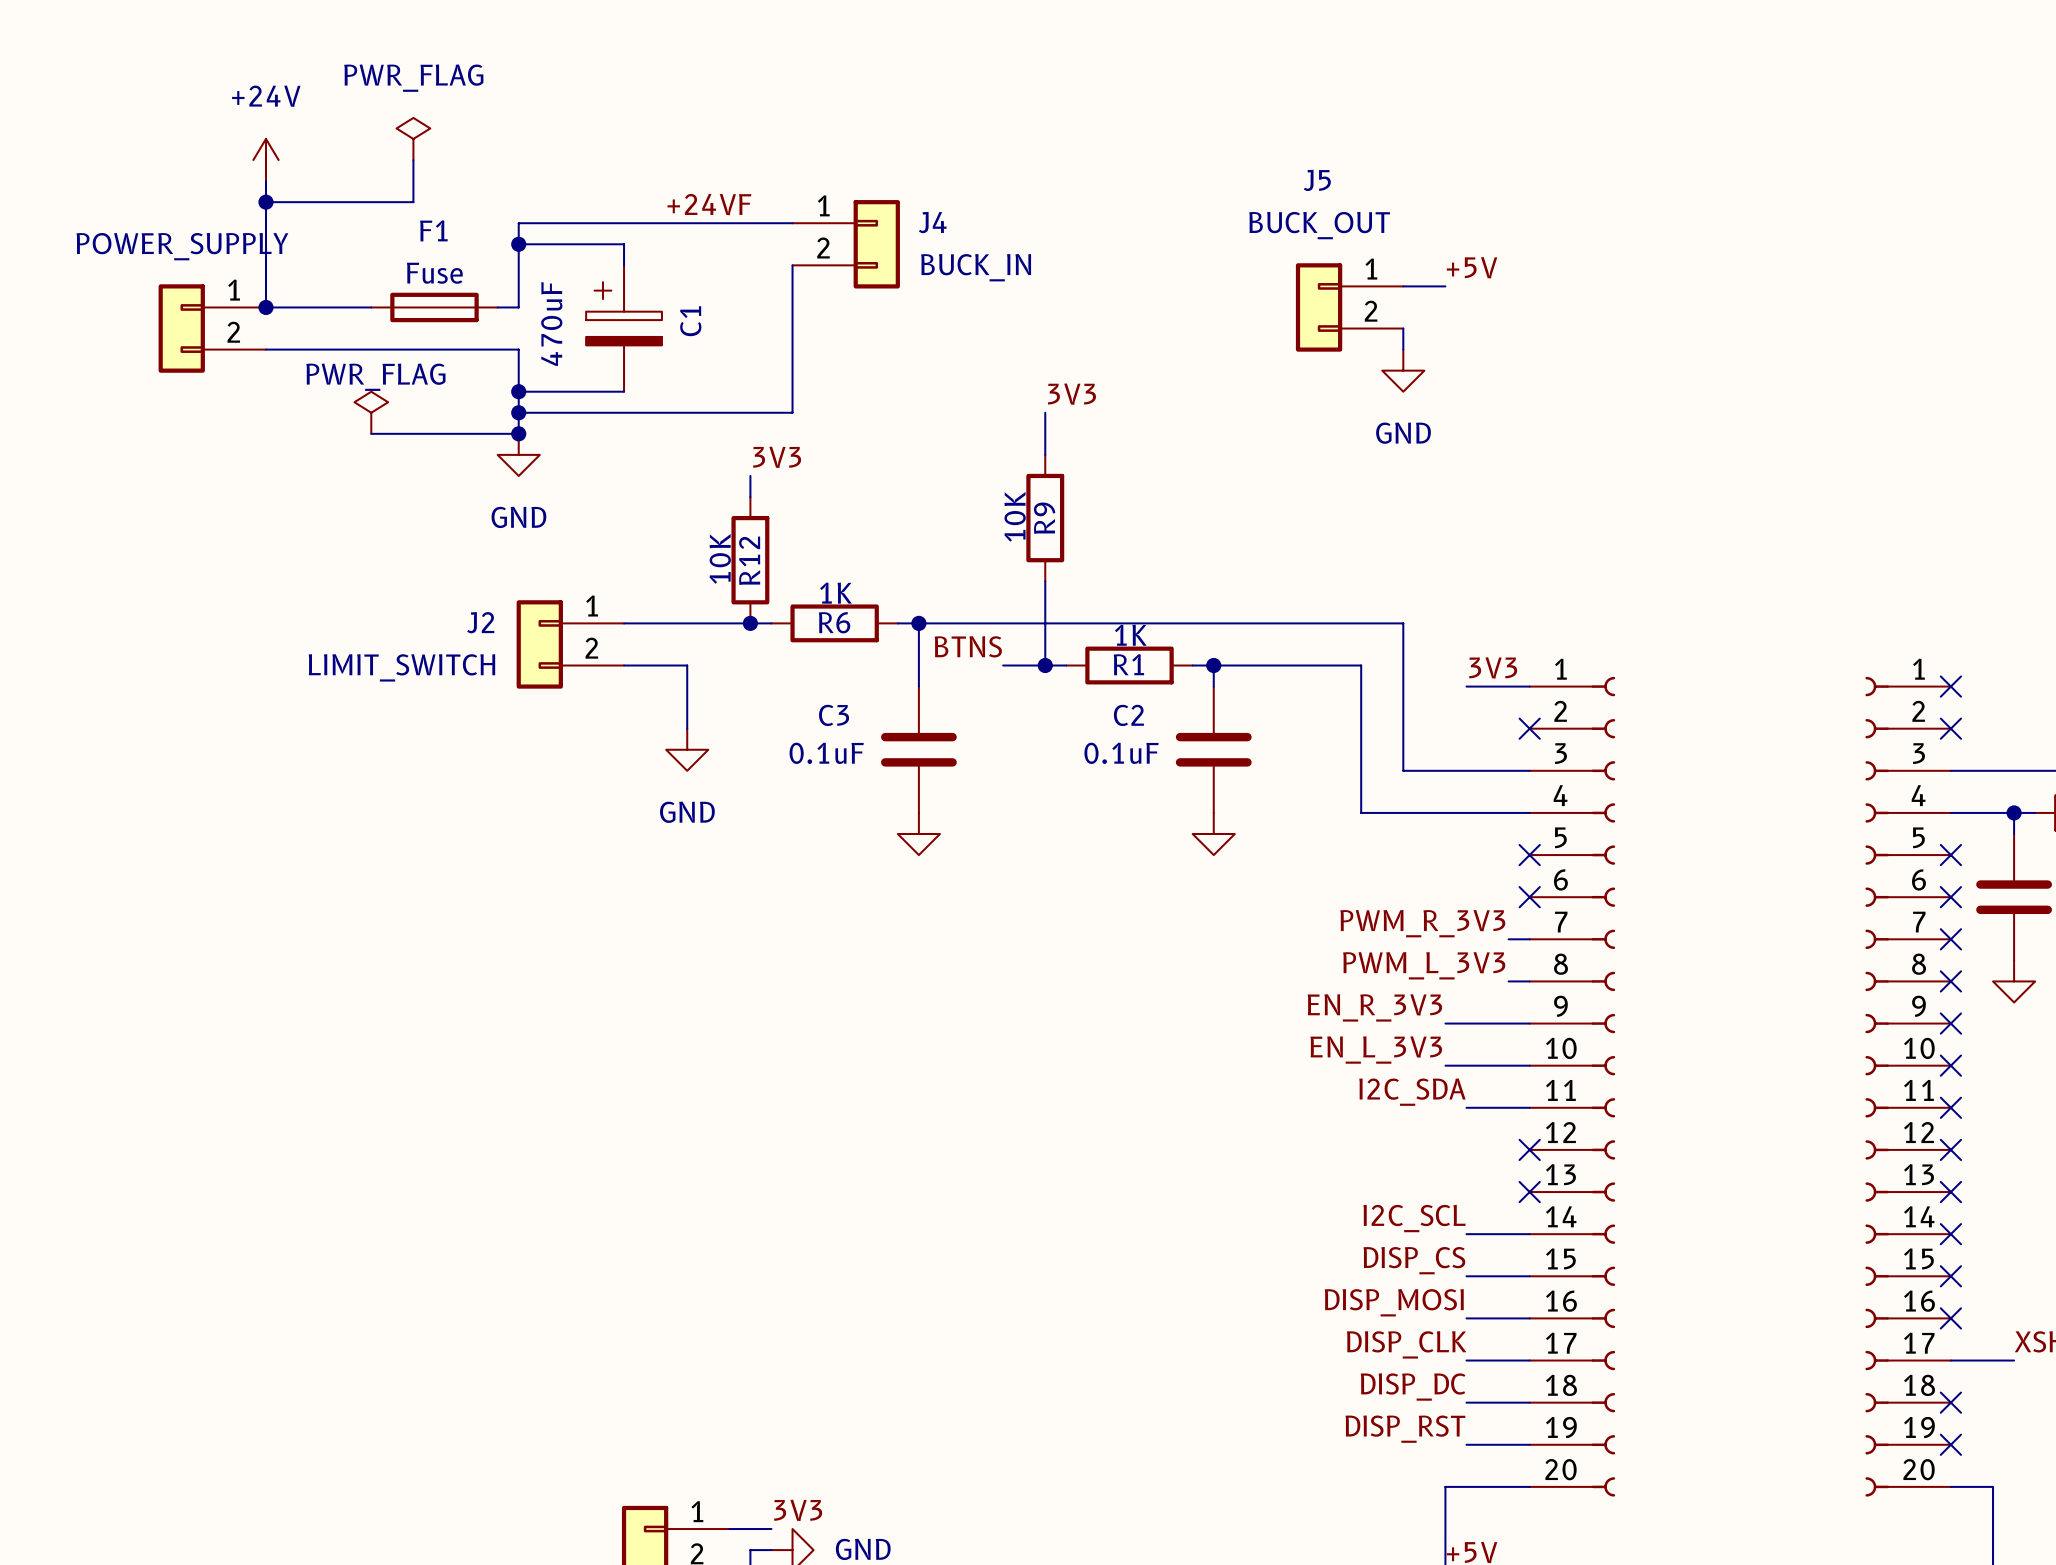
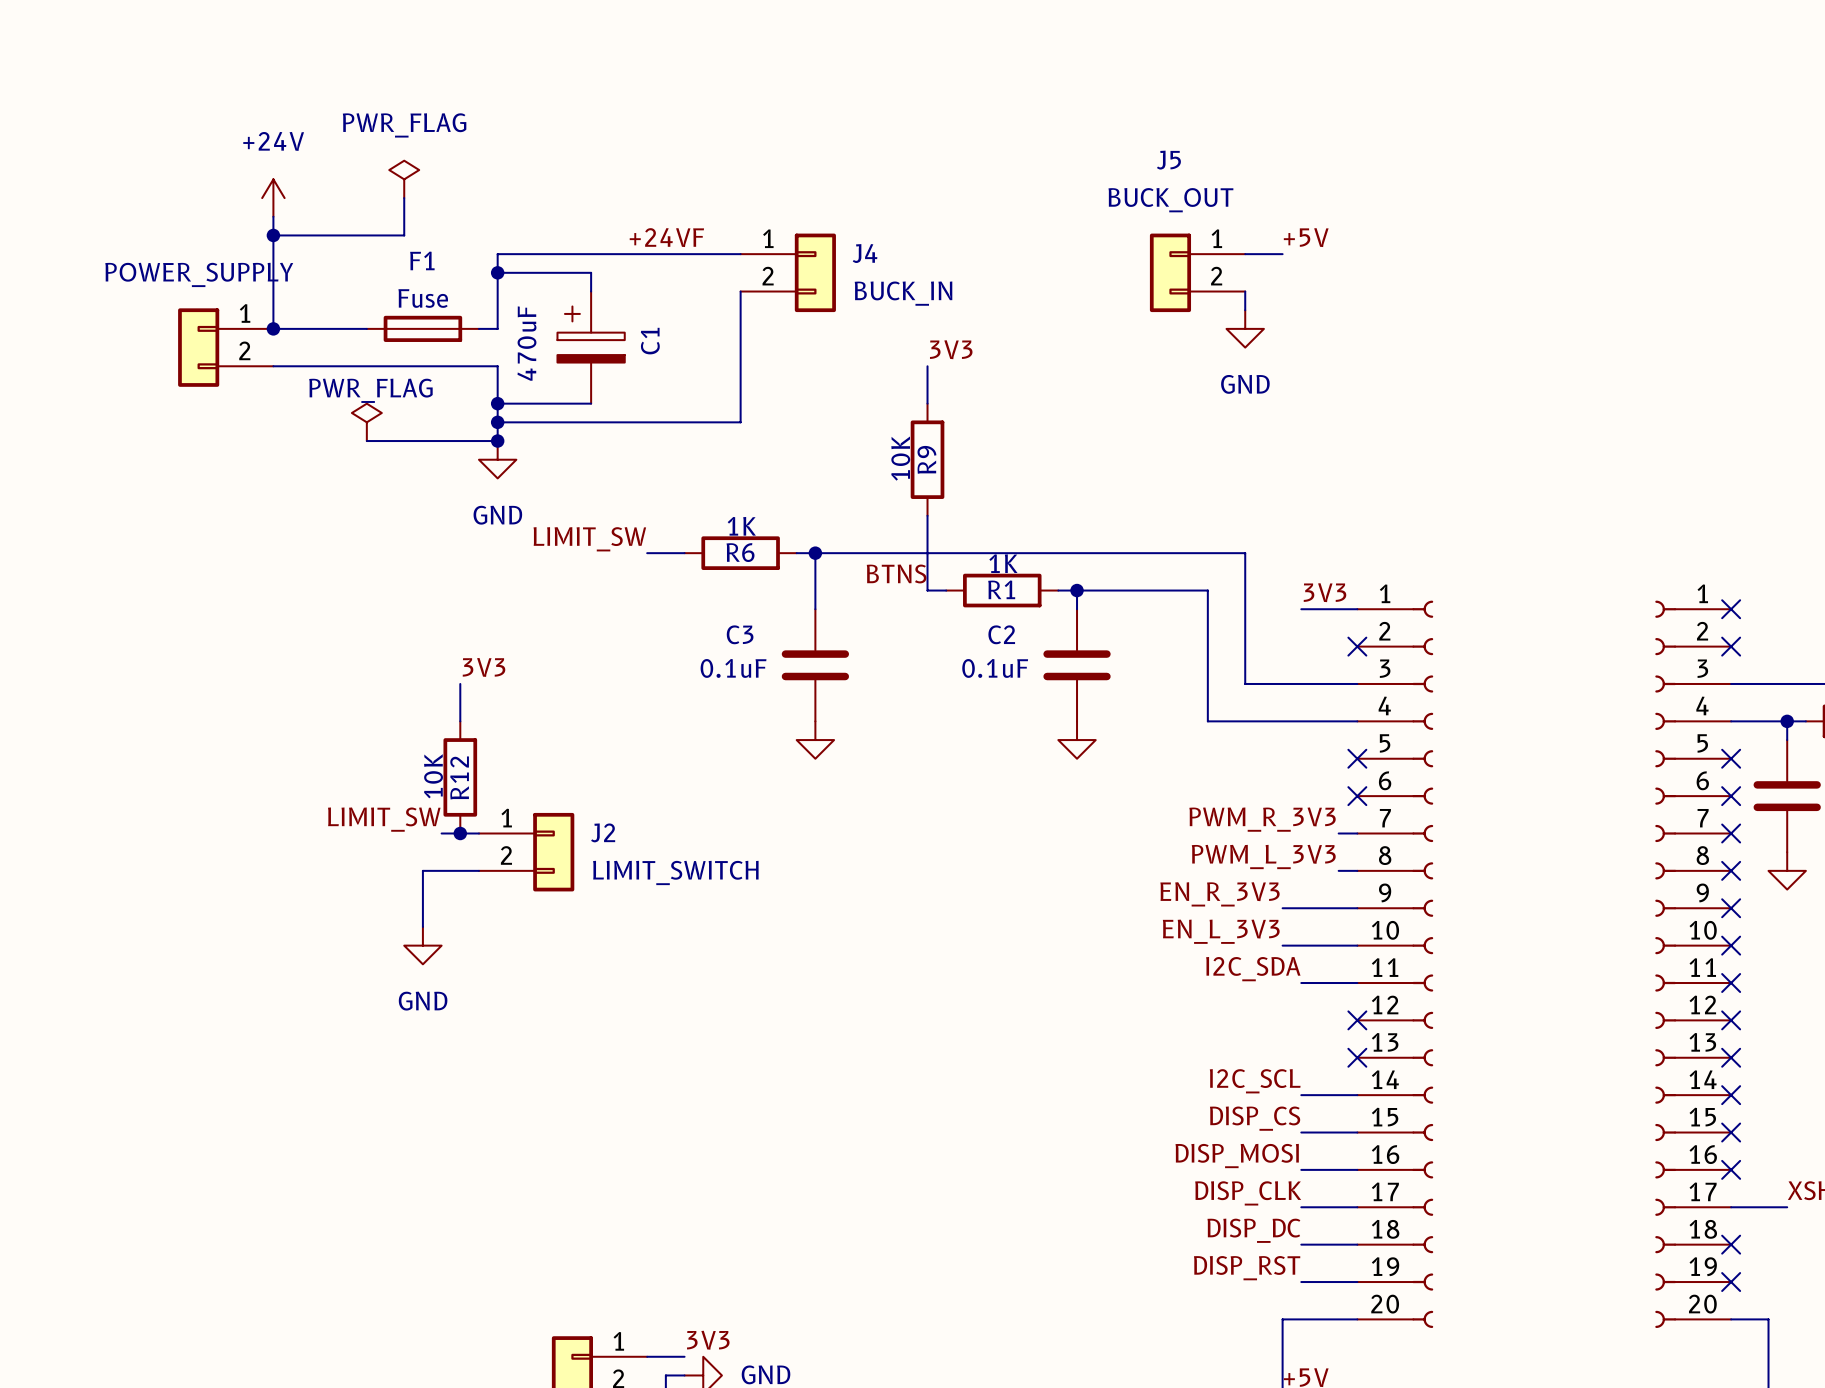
power symbol position: PWR_FLAG (413, 138) -> PWR_FLAG (404, 179)
power symbol position: +24V (265, 160) -> +24V (273, 198)
wire: (413, 160) (413, 202) (265, 202) -> (404, 198) (404, 235) (273, 235)
wire: (265, 181) (265, 307) (371, 307) -> (273, 216) (273, 328) (366, 328)
junction: (265, 202) -> none
label position: +24VF (709, 204) -> +24VF (666, 237)
wire: (792, 223) (518, 223) (518, 307) (497, 307) -> (740, 254) (497, 254) (497, 328) (478, 328)
wire: (518, 244) (624, 244) (624, 265) -> (497, 272) (591, 272) (591, 291)
junction: (518, 244) -> none
J4 position: (846, 244) -> (788, 272)
junction: none -> (273, 235)
wire: (792, 265) (792, 412) (560, 412) -> (366, 441) (497, 441) (497, 366)
junction: (265, 307) -> none
F1 position: (434, 307) -> (422, 328)
junction: none -> (497, 272)
part position: (212, 328) -> (225, 347)
C1 position: (624, 328) -> (591, 347)
wire: none -> (740, 291) (740, 422) (497, 422)
wire: (265, 349) (518, 349) (518, 433) (371, 433) -> none
junction: none -> (273, 328)
wire: (518, 391) (624, 391) -> (497, 403) (591, 403)
junction: (518, 391) -> none
wire: none -> (273, 366) (460, 366)
power symbol position: PWR_FLAG (371, 412) -> PWR_FLAG (366, 422)
junction: (518, 412) -> none
junction: (518, 433) -> none
power symbol position: GND (518, 454) -> GND (497, 459)
junction: none -> (497, 403)
label position: 3V3 (777, 457) -> 3V3 (484, 667)
junction: none -> (497, 422)
wire: (750, 475) (750, 497) -> none
junction: none -> (497, 441)
R12 position: (750, 560) -> (460, 777)
label: none -> LIMIT_SW (589, 539)
wire: (624, 623) (729, 623) -> none
junction: (750, 623) -> none
J2 flip: as is (539, 644) -> left-right (553, 852)
J2 position: (570, 644) -> (526, 852)
label position: BTNS (968, 646) -> BTNS (896, 573)
wire: (624, 665) (687, 665) (687, 728) -> none
wire: (1003, 665) (1045, 665) -> none
junction: (1045, 665) -> none
power symbol: GND (687, 749) -> none
wire: none -> (460, 683) (460, 721)
label: none -> LIMIT_SW (384, 819)
wire: none -> (441, 833) (478, 833)
junction: none -> (460, 833)
wire: none -> (478, 870) (422, 870) (422, 926)
power symbol: none -> GND (422, 945)

